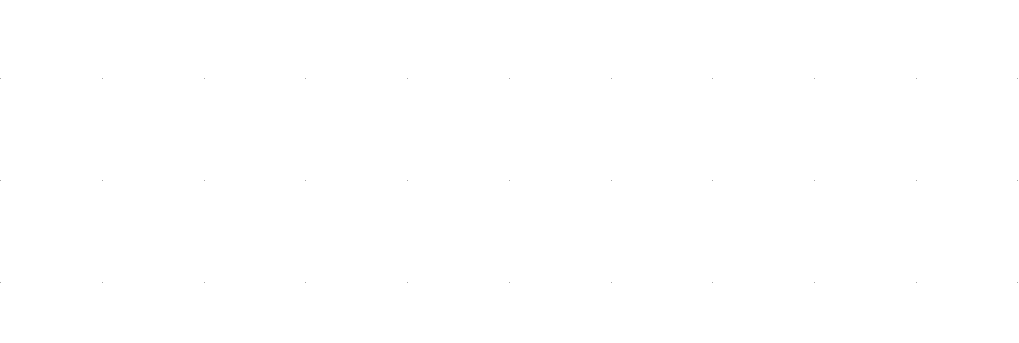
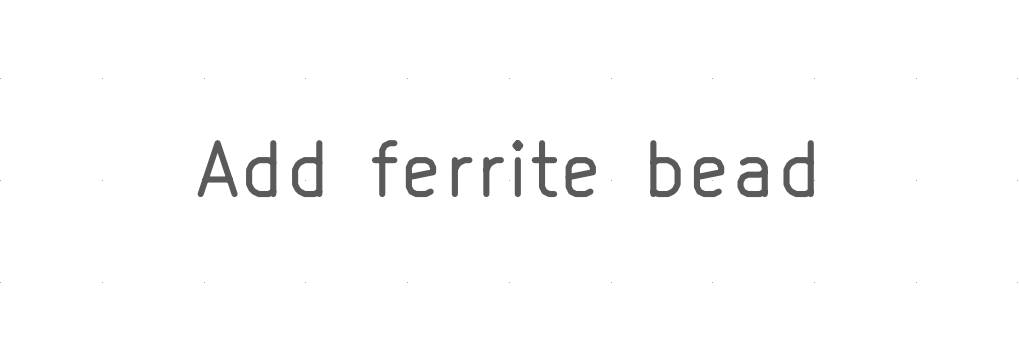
text: none -> Add ferrite bead (505, 168)

